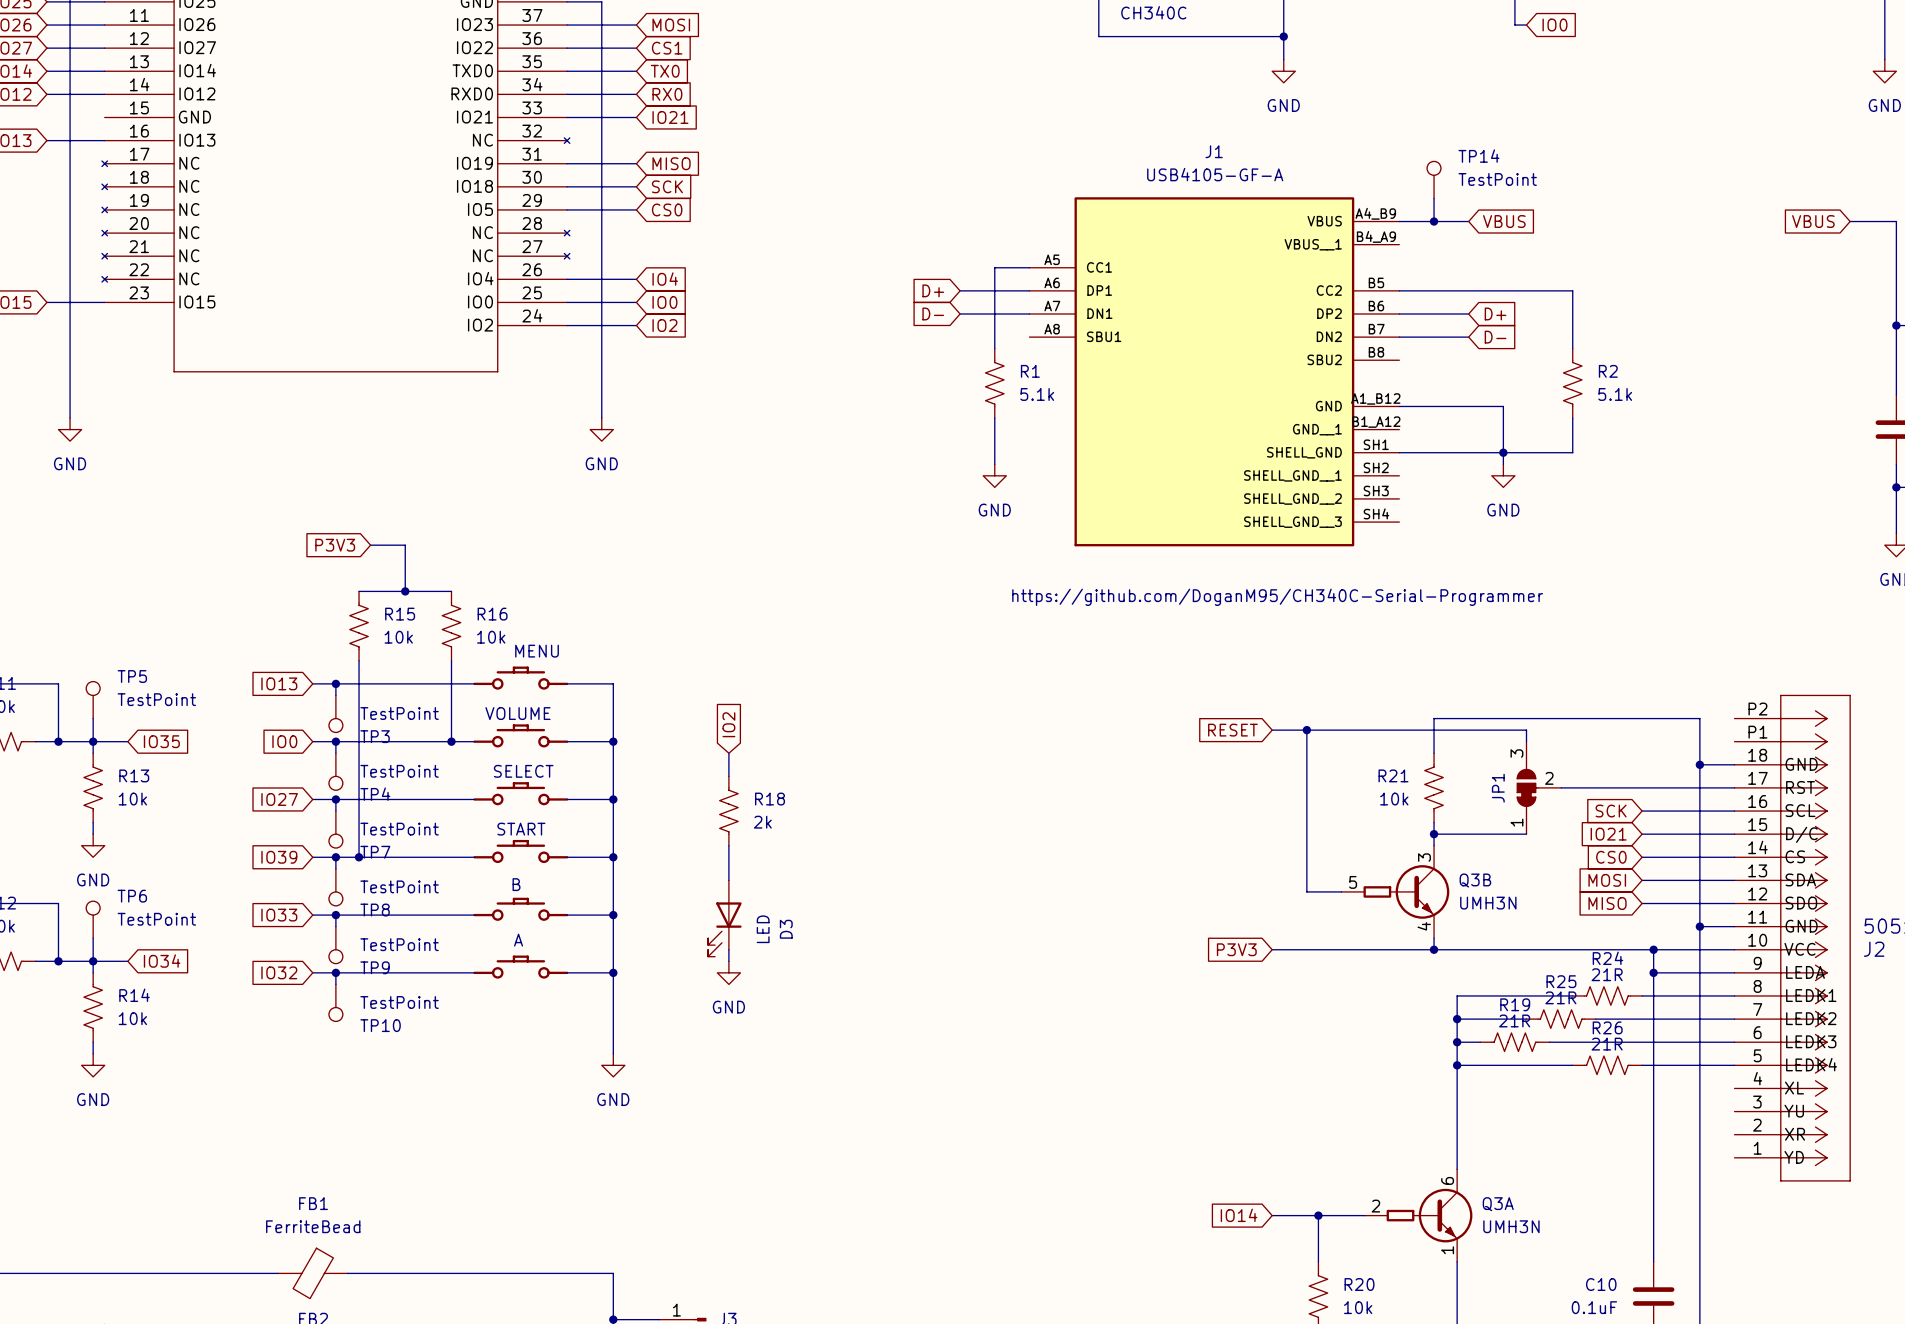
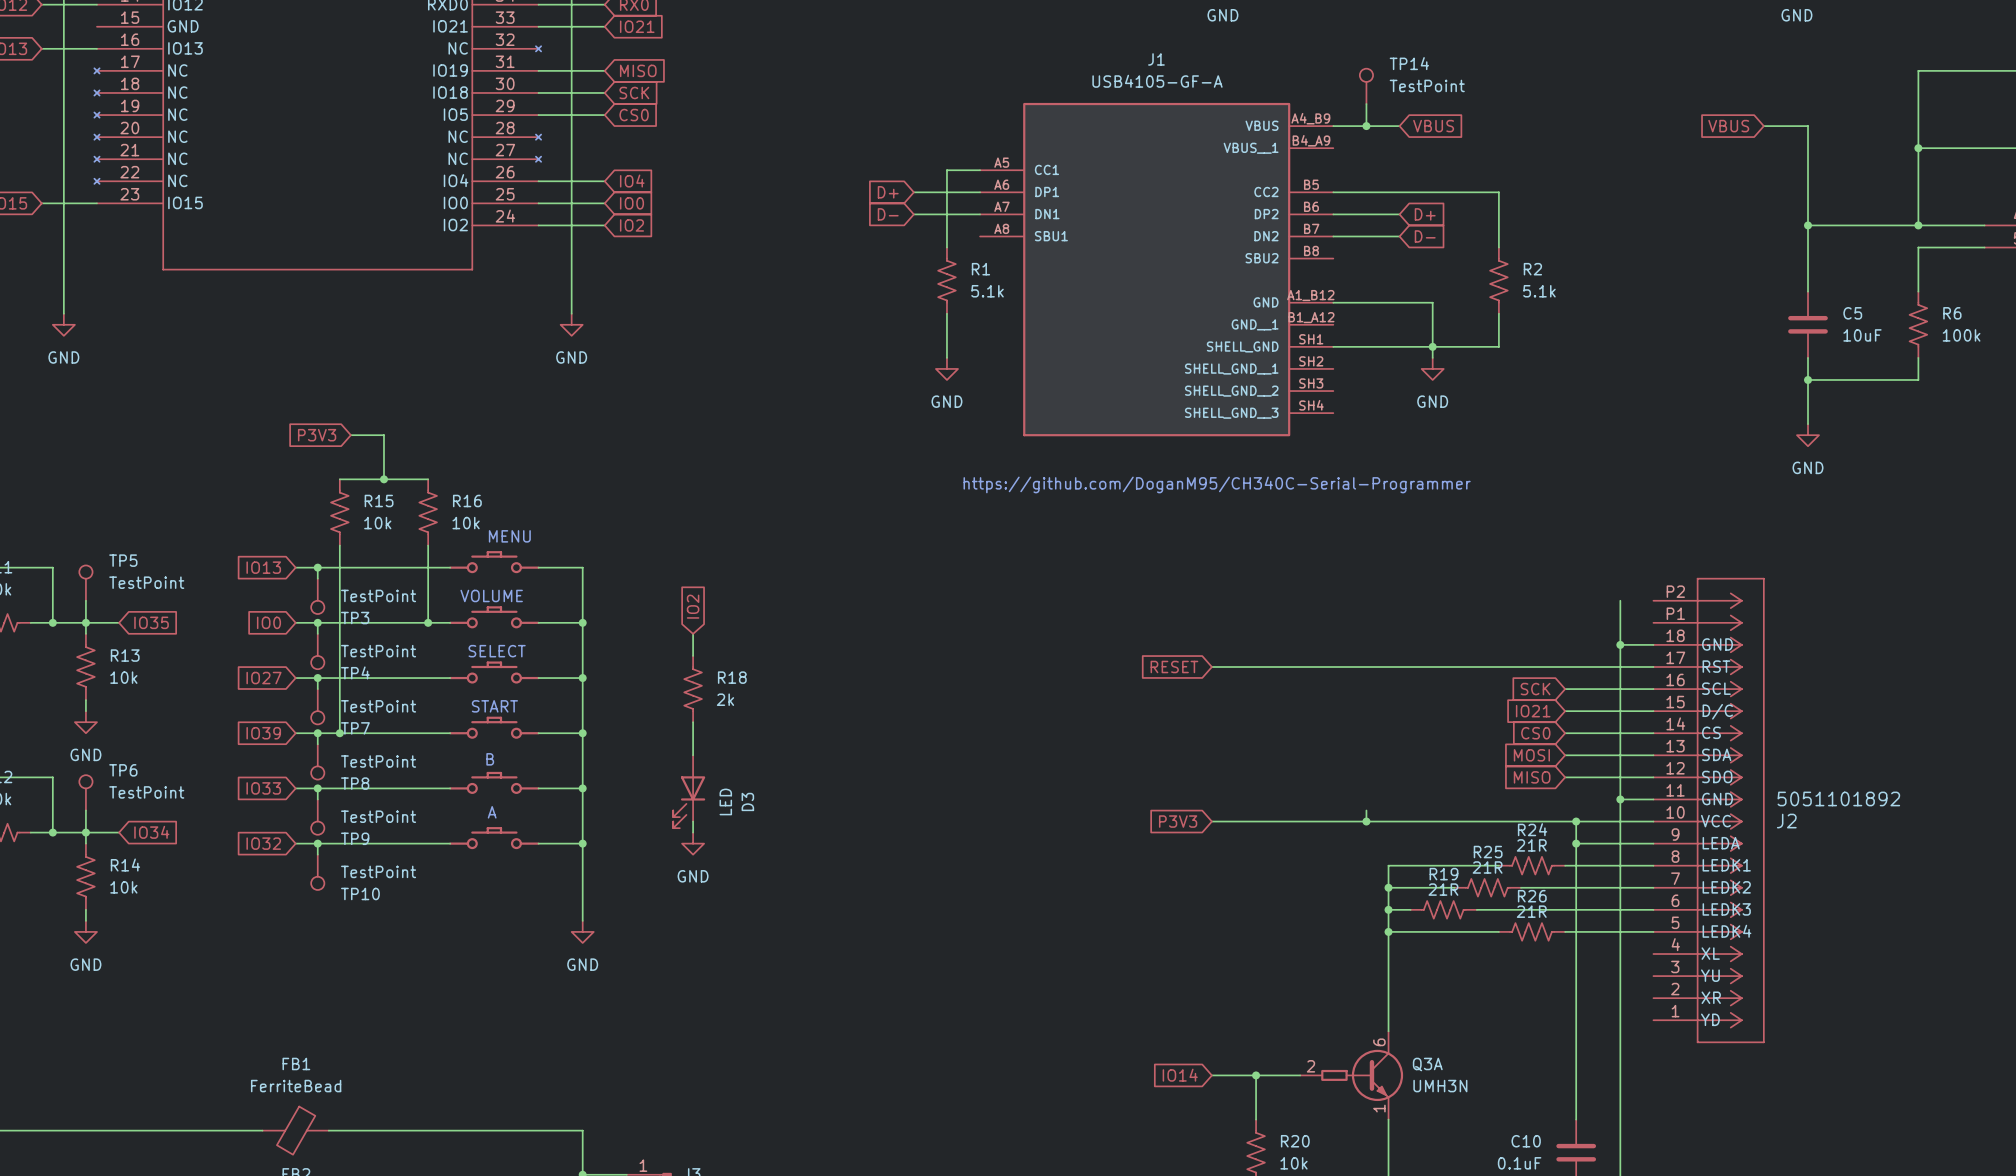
wire: (1699, 718) (1434, 718) (1434, 753) -> none
global label position: RESET (1232, 730) -> RESET (1174, 667)
wire: (1272, 730) (1526, 730) (1526, 741) -> none
wire: (1306, 730) (1306, 891) (1341, 891) -> none
junction: (1306, 730) -> none
wire: none -> (1211, 667) (1487, 667)
R21: 10k (1434, 787) -> none
JP1: (1539, 787) -> none
wire: (1434, 822) (1434, 845) -> none
wire: (1434, 834) (1526, 834) -> none
junction: (1434, 834) -> none
Q3B: UMH3N (1395, 891) -> none

